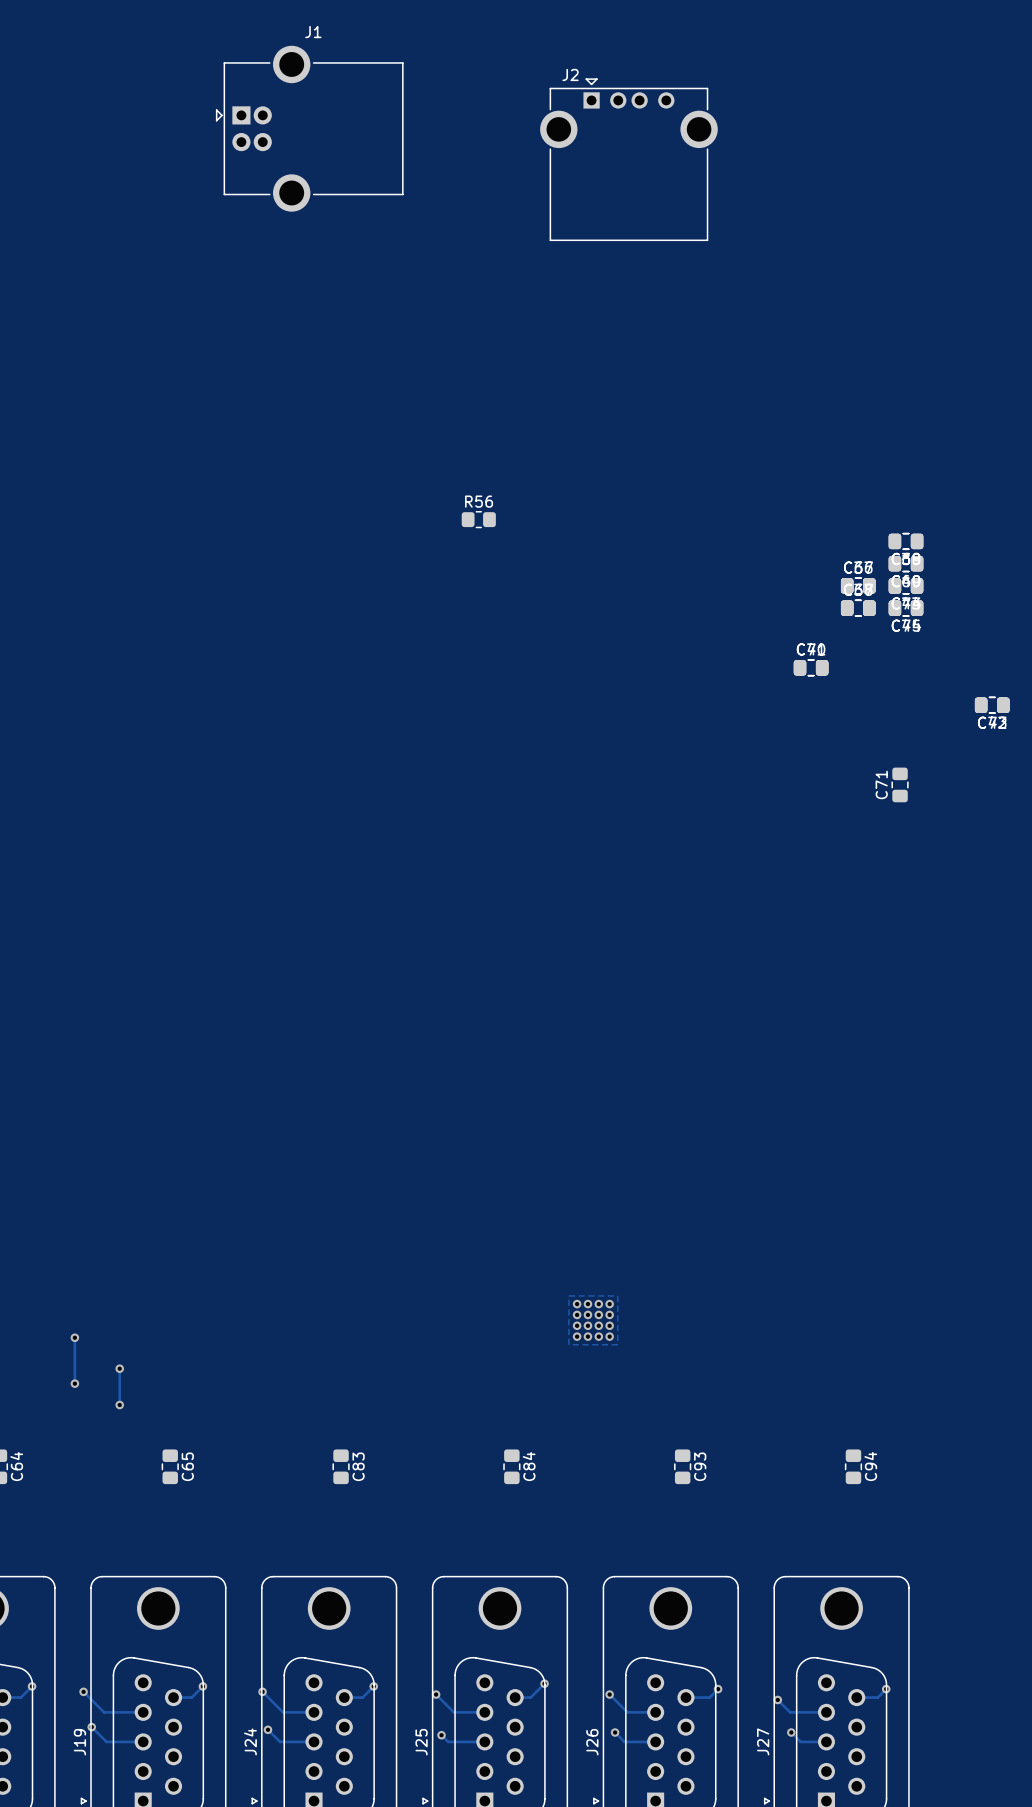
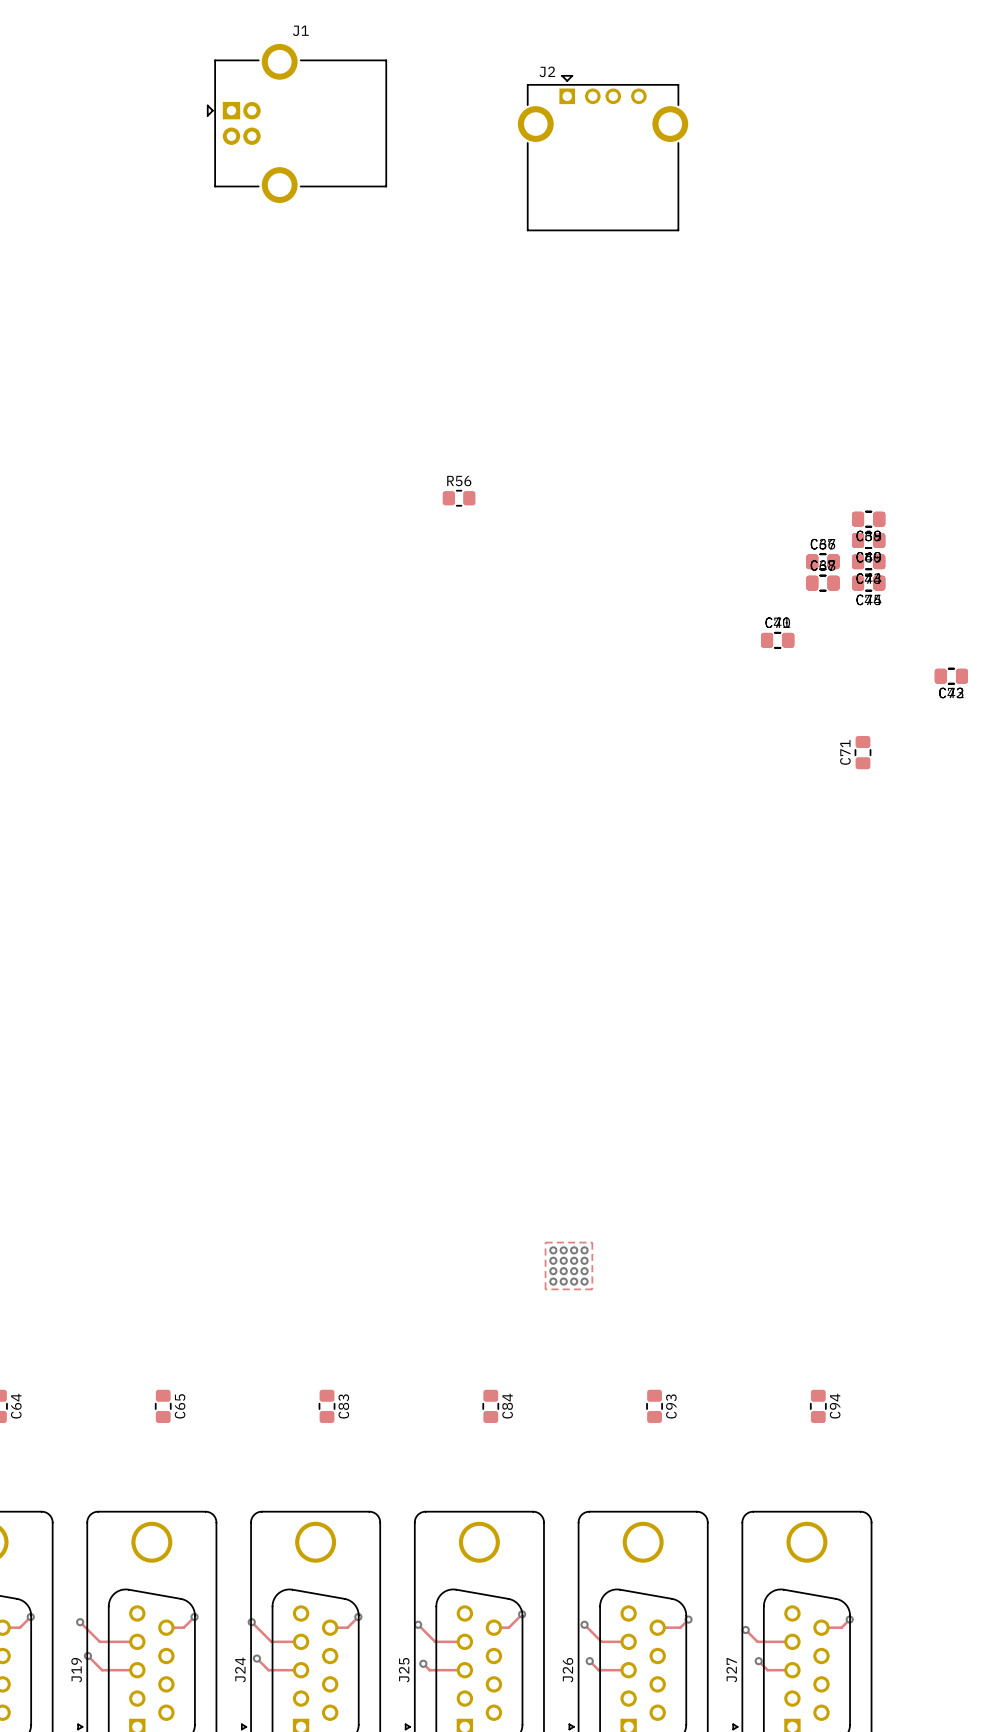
track: (74, 1337) (74, 1383) -> none
via: (74, 1337) -> none
track: (119, 1368) (119, 1405) -> none
via: (119, 1368) -> none
via: (74, 1383) -> none
via: (119, 1405) -> none

